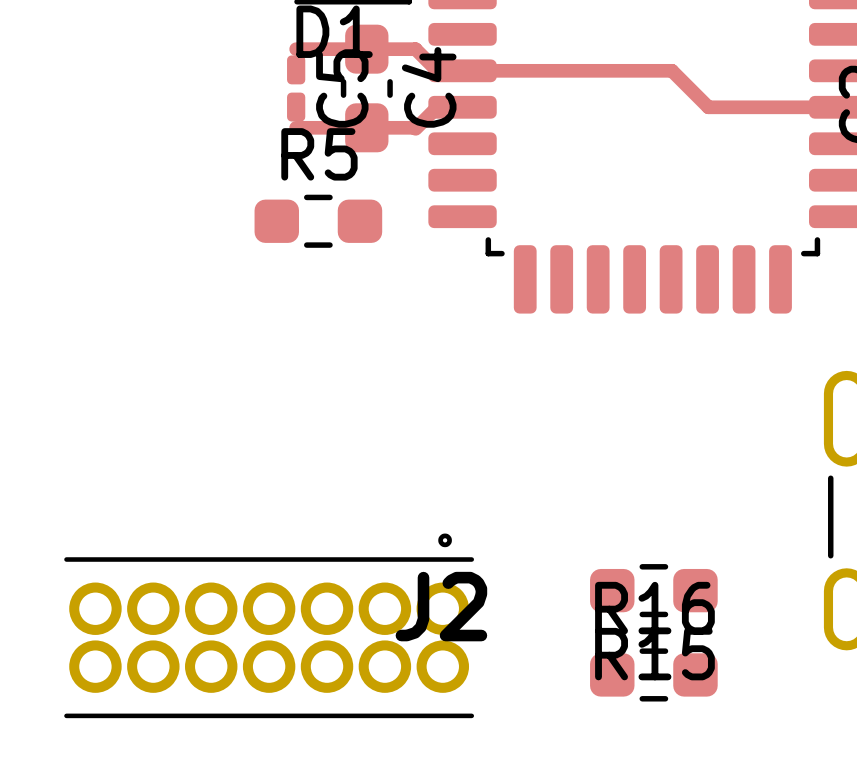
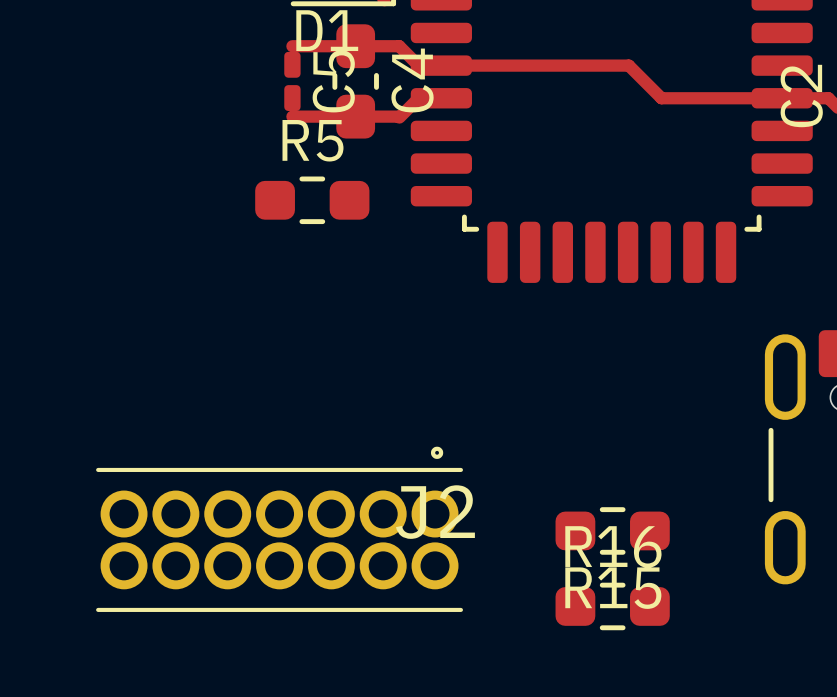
J2 position: (269, 625) -> (279, 529)

